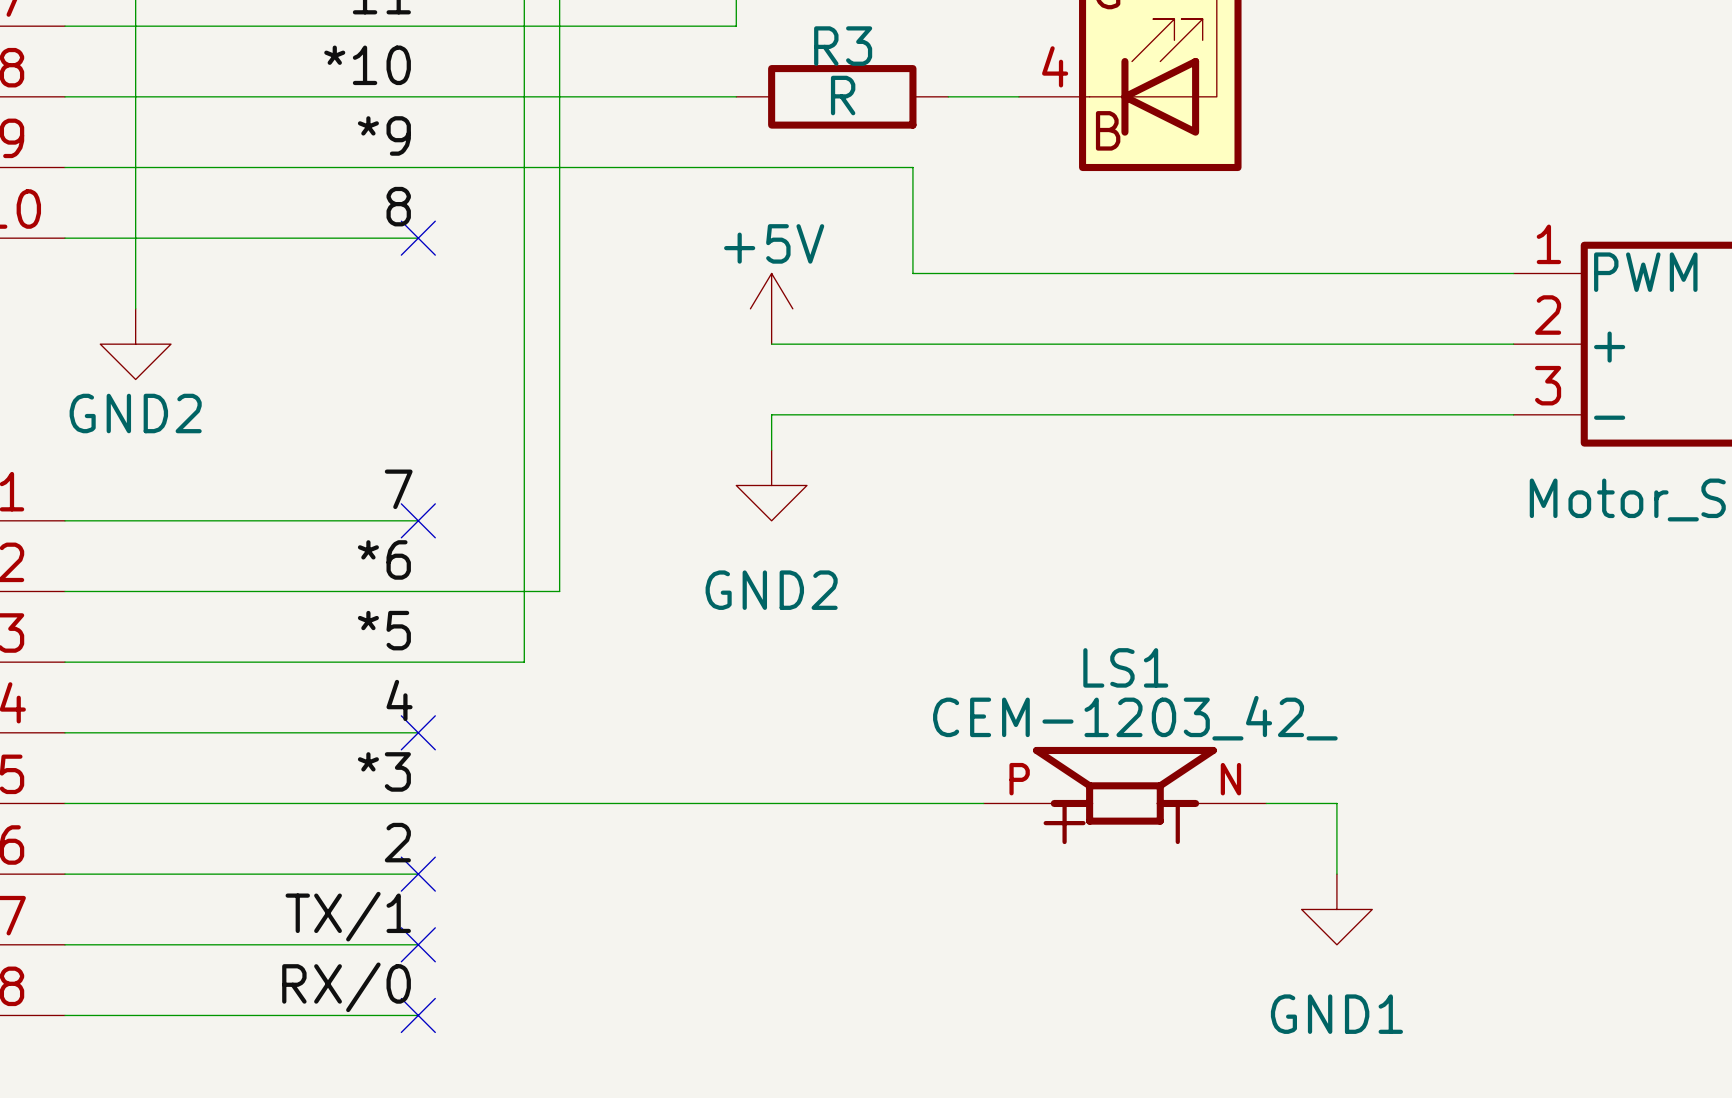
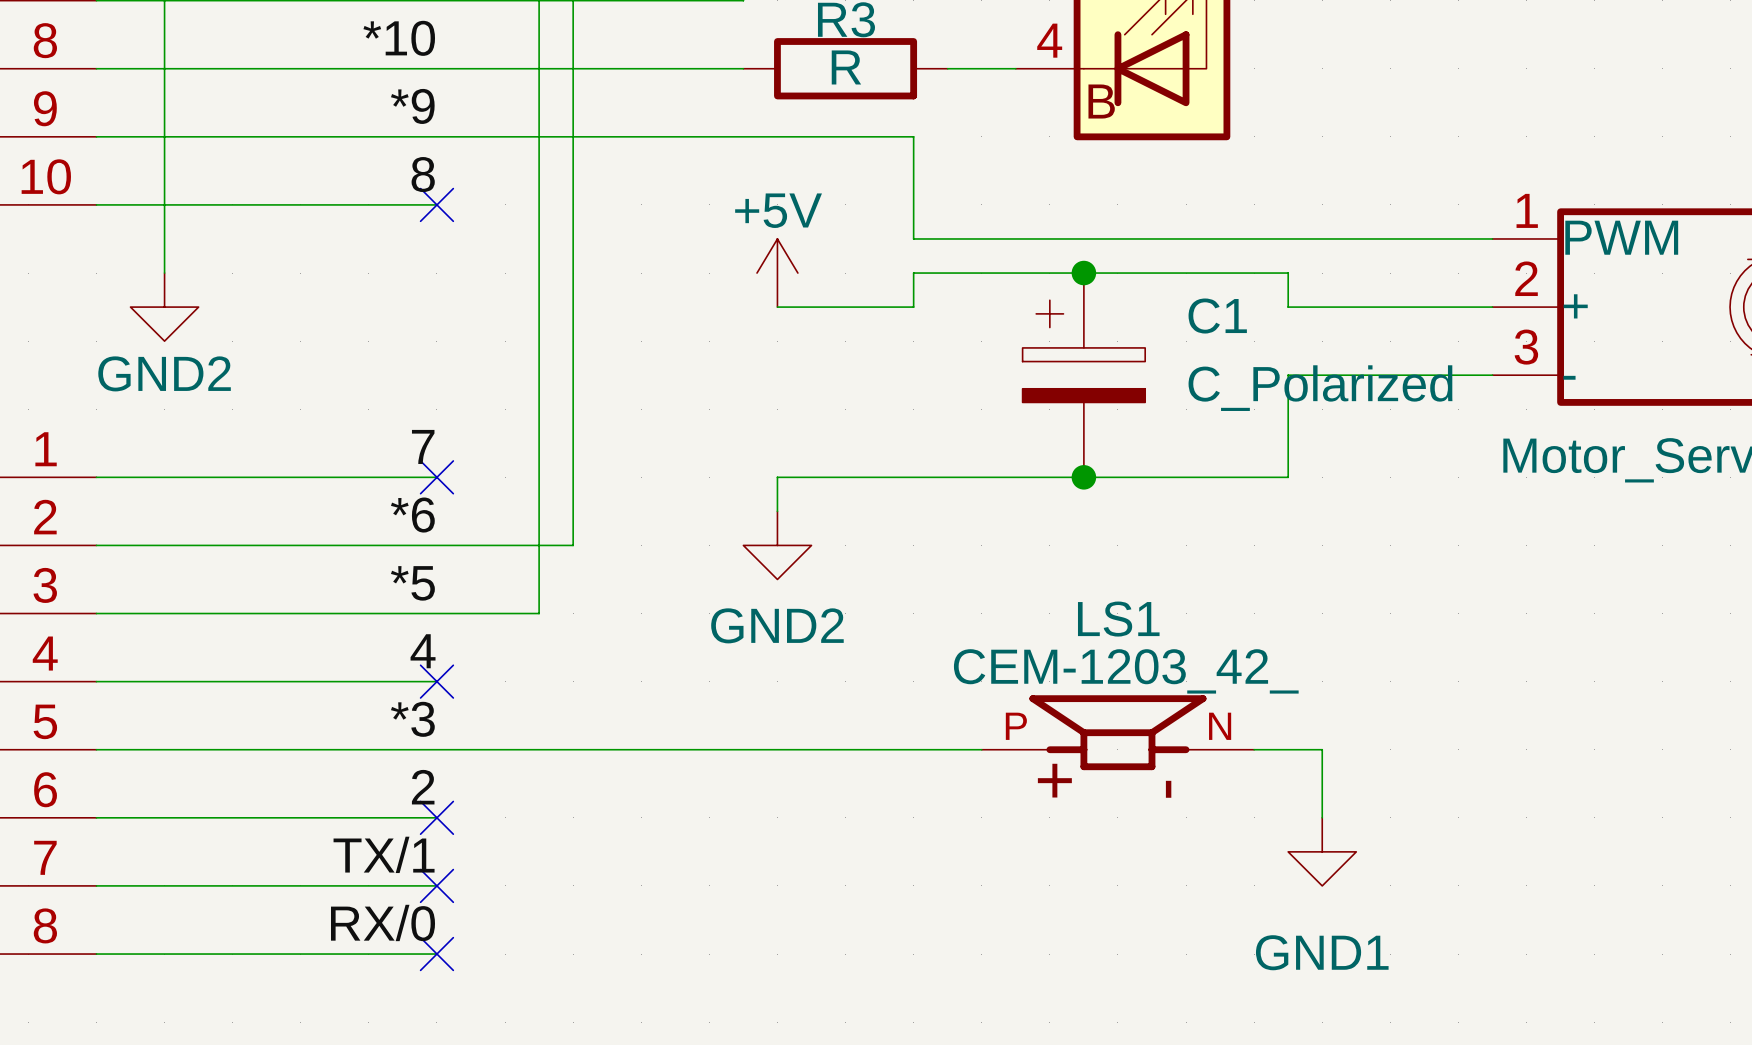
junction: none -> (1083, 273)
wire: (912, 344) (1301, 344) -> (913, 307) (913, 273) (1288, 273) (1288, 307)
C1: none -> C_Polarized (1083, 375)
wire: (1301, 414) (771, 414) (771, 450) -> (1288, 375) (1288, 477) (777, 477) (777, 511)
power symbol position: GND2 (771, 485) -> GND2 (777, 545)
junction: none -> (1083, 477)
power symbol text position: GND2 (771, 590) -> GND2 (777, 625)

